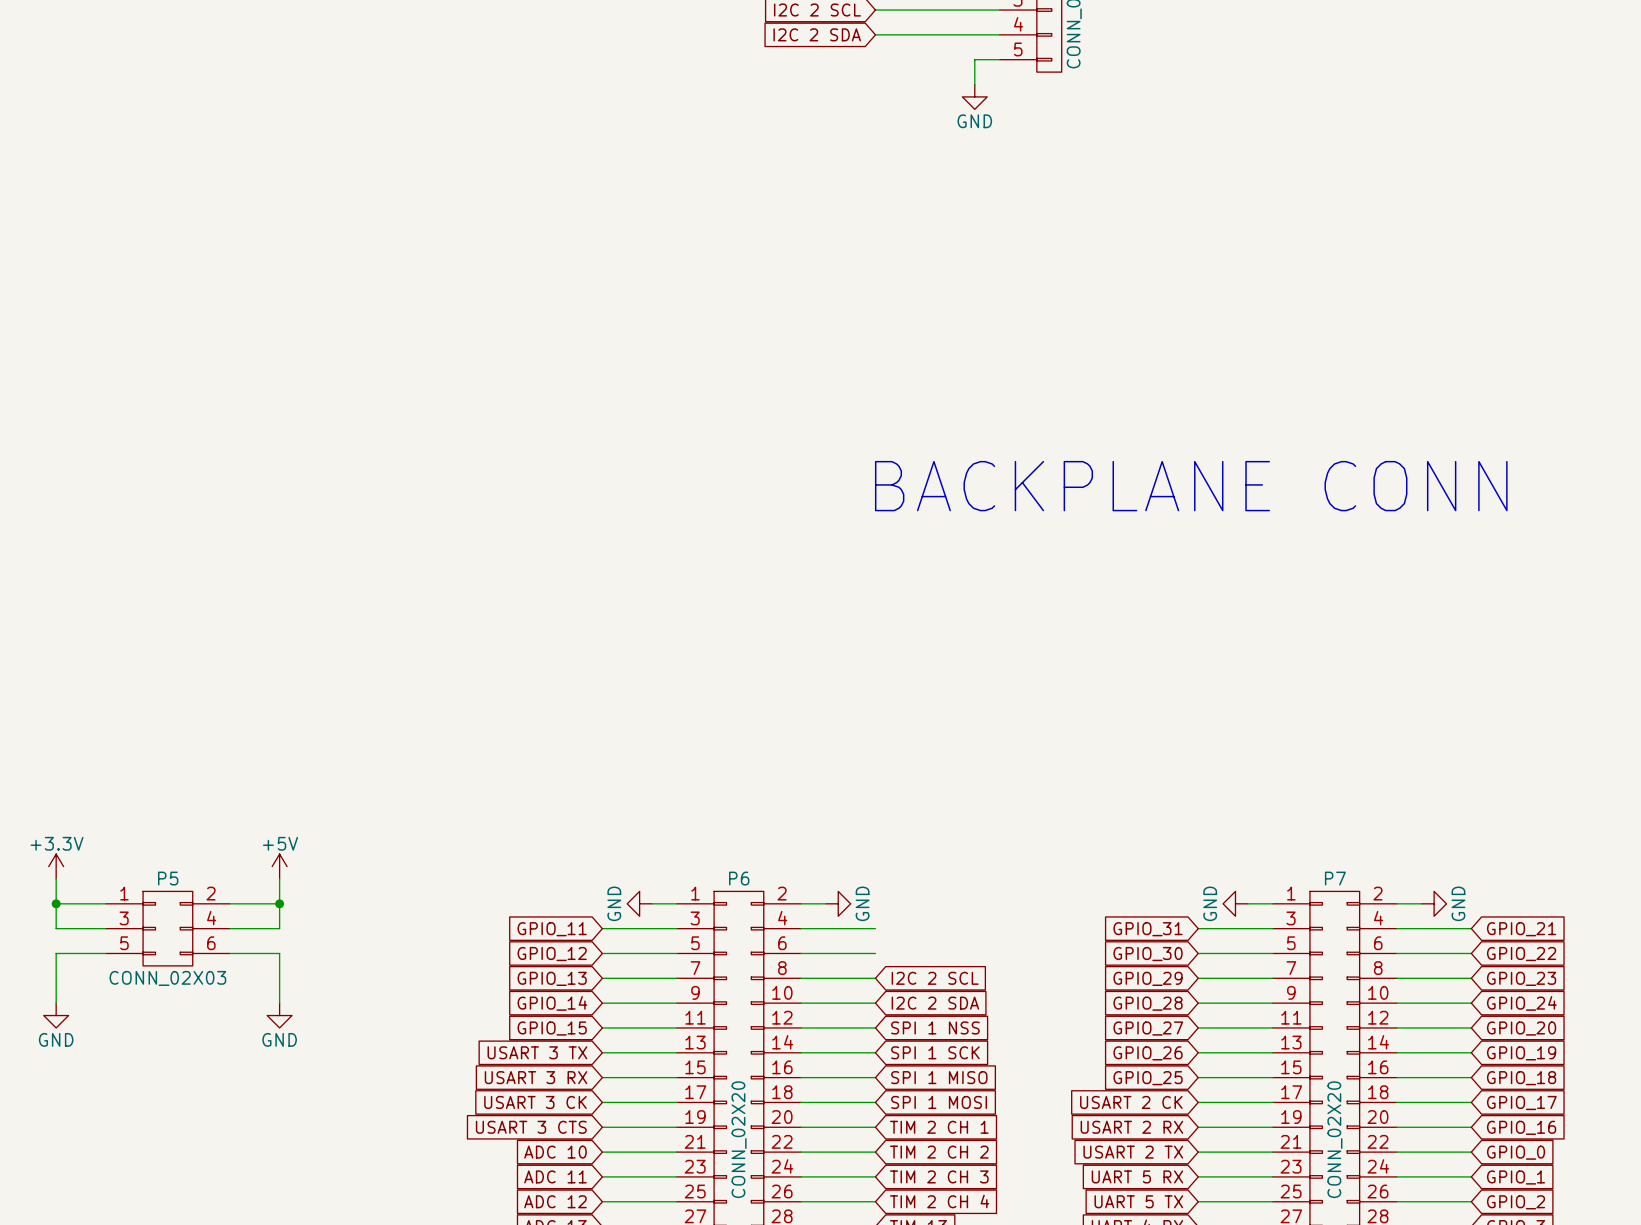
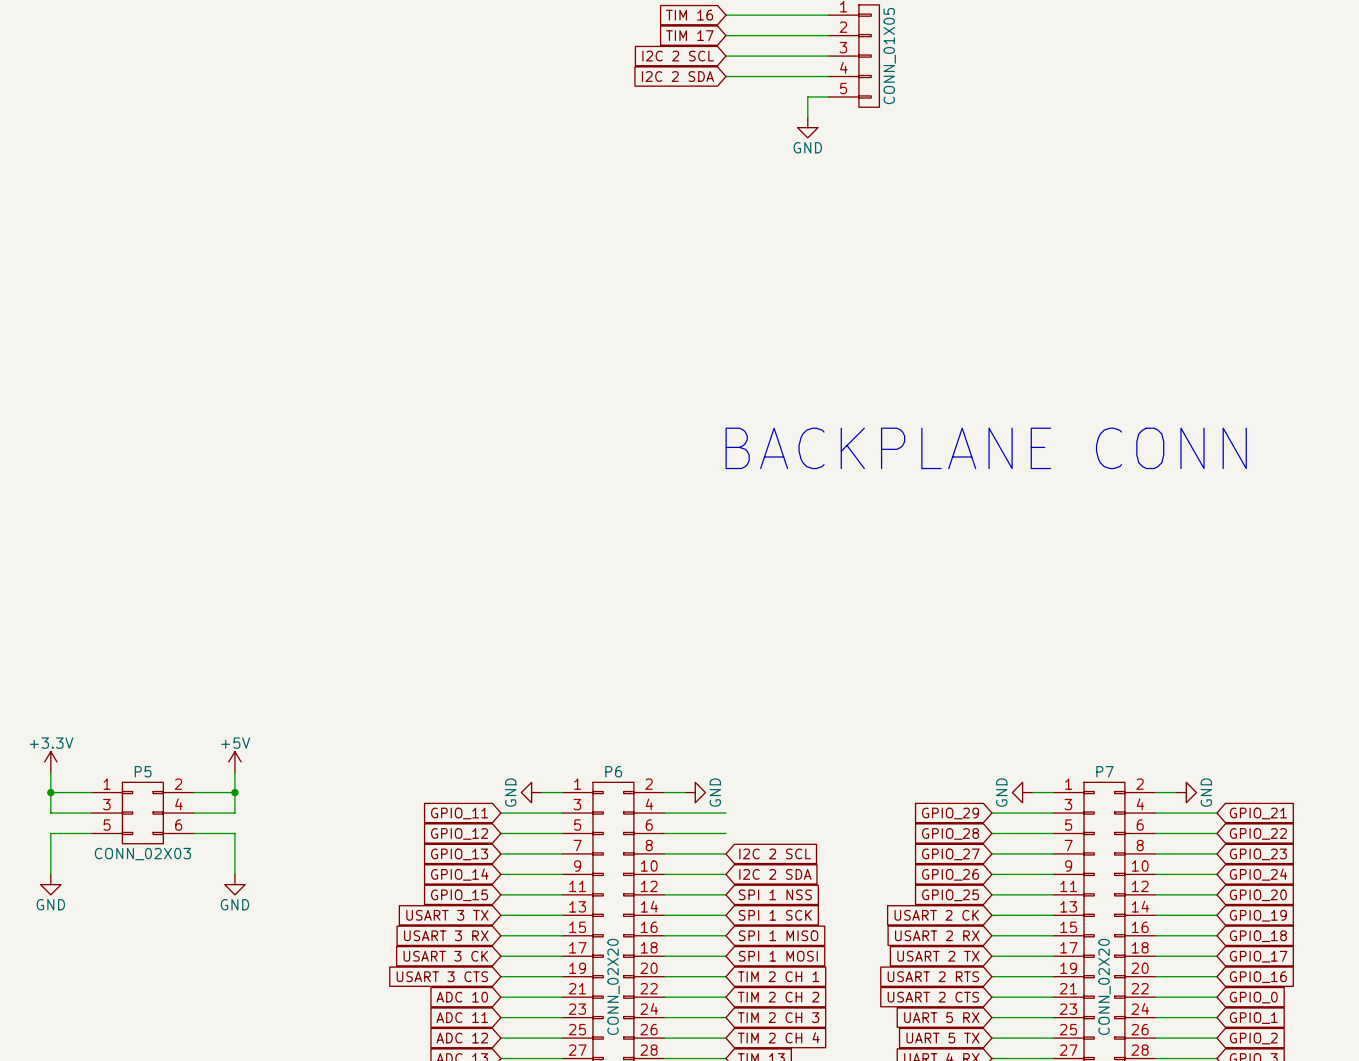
global label: GPIO_31 (1148, 929) -> GPIO_29 (950, 813)
global label: GPIO_30 (1148, 954) -> GPIO_28 (950, 833)
global label: GPIO_29 (1148, 978) -> GPIO_27 (950, 854)
global label: GPIO_28 (1148, 1003) -> GPIO_26 (950, 874)
global label: GPIO_27 (1148, 1028) -> GPIO_25 (950, 895)
global label: GPIO_26 (1148, 1053) -> USART 2 CK (936, 915)
global label: GPIO_25 (1148, 1078) -> USART 2 RX (937, 935)
global label: USART 2 CK (1131, 1102) -> USART 2 TX (938, 956)
global label: USART 2 RX (1131, 1127) -> USART 2 RTS (933, 976)
global label: USART 2 TX (1133, 1152) -> USART 2 CTS (933, 997)

